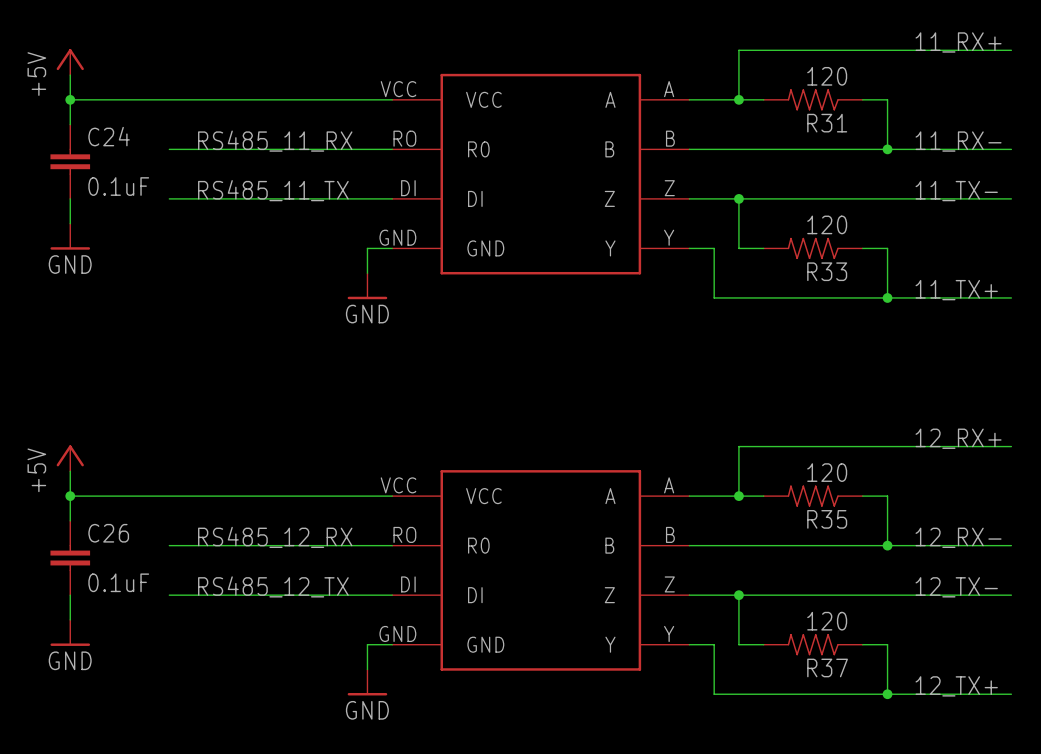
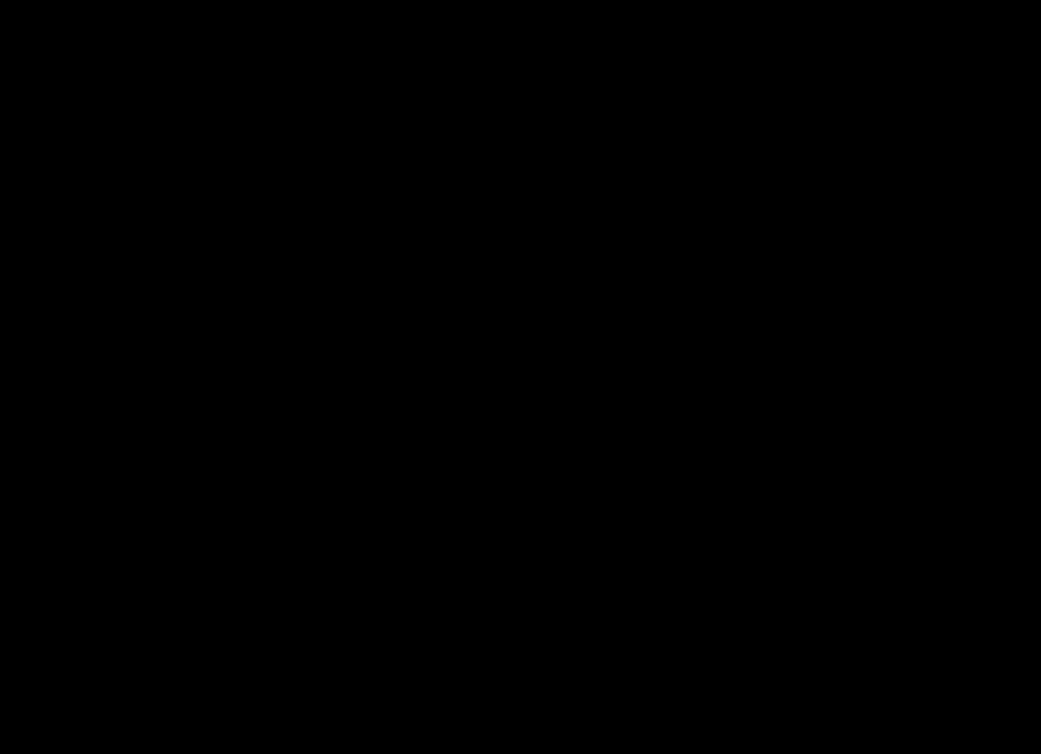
label: 11_RX+ (958, 42) -> none
wire: (1011, 50) (738, 50) (738, 99) -> none
power symbol: +5V (70, 62) -> none
wire: (70, 75) (70, 124) -> none
wire: (70, 99) (392, 99) -> none
junction: (70, 99) -> none
wire: (689, 99) (763, 99) -> none
junction: (738, 99) -> none
R31: 120 (813, 99) -> none
wire: (862, 99) (887, 99) (887, 149) -> none
label: RS485_11_RX (275, 141) -> none
label: 11_RX- (958, 141) -> none
wire: (169, 149) (392, 149) -> none
wire: (689, 149) (1011, 149) -> none
junction: (887, 149) -> none
C24: 0.1uF (70, 161) -> none
part: (540, 174) -> none
label: RS485_11_TX (273, 190) -> none
label: 11_TX- (956, 191) -> none
wire: (70, 198) (70, 223) -> none
wire: (169, 198) (392, 198) -> none
wire: (689, 198) (1011, 198) -> none
wire: (738, 198) (738, 248) (763, 248) -> none
junction: (738, 198) -> none
power symbol: GND (70, 236) -> none
wire: (392, 248) (367, 248) (367, 273) -> none
wire: (689, 248) (714, 248) (714, 297) (1011, 297) -> none
R33: 120 (813, 248) -> none
wire: (862, 248) (887, 248) (887, 297) -> none
power symbol: GND (367, 286) -> none
label: 11_TX+ (956, 290) -> none
junction: (887, 297) -> none
label: 12_RX+ (958, 438) -> none
wire: (1011, 446) (738, 446) (738, 496) -> none
power symbol: +5V (70, 458) -> none
wire: (70, 471) (70, 520) -> none
wire: (70, 496) (392, 496) -> none
junction: (70, 496) -> none
wire: (689, 496) (763, 496) -> none
junction: (738, 496) -> none
R35: 120 (813, 496) -> none
wire: (862, 496) (887, 496) (887, 545) -> none
label: RS485_12_RX (275, 537) -> none
label: 12_RX- (958, 537) -> none
wire: (169, 545) (392, 545) -> none
wire: (689, 545) (1011, 545) -> none
junction: (887, 545) -> none
C26: 0.1uF (70, 558) -> none
part: (540, 570) -> none
label: RS485_12_TX (273, 586) -> none
label: 12_TX- (956, 587) -> none
wire: (70, 595) (70, 619) -> none
wire: (169, 595) (392, 595) -> none
wire: (689, 595) (1011, 595) -> none
wire: (738, 595) (738, 644) (763, 644) -> none
junction: (738, 595) -> none
power symbol: GND (70, 632) -> none
wire: (392, 644) (367, 644) (367, 669) -> none
wire: (689, 644) (714, 644) (714, 694) (1011, 694) -> none
R37: 120 (813, 644) -> none
wire: (862, 644) (887, 644) (887, 694) -> none
power symbol: GND (367, 682) -> none
label: 12_TX+ (956, 686) -> none
junction: (887, 694) -> none

